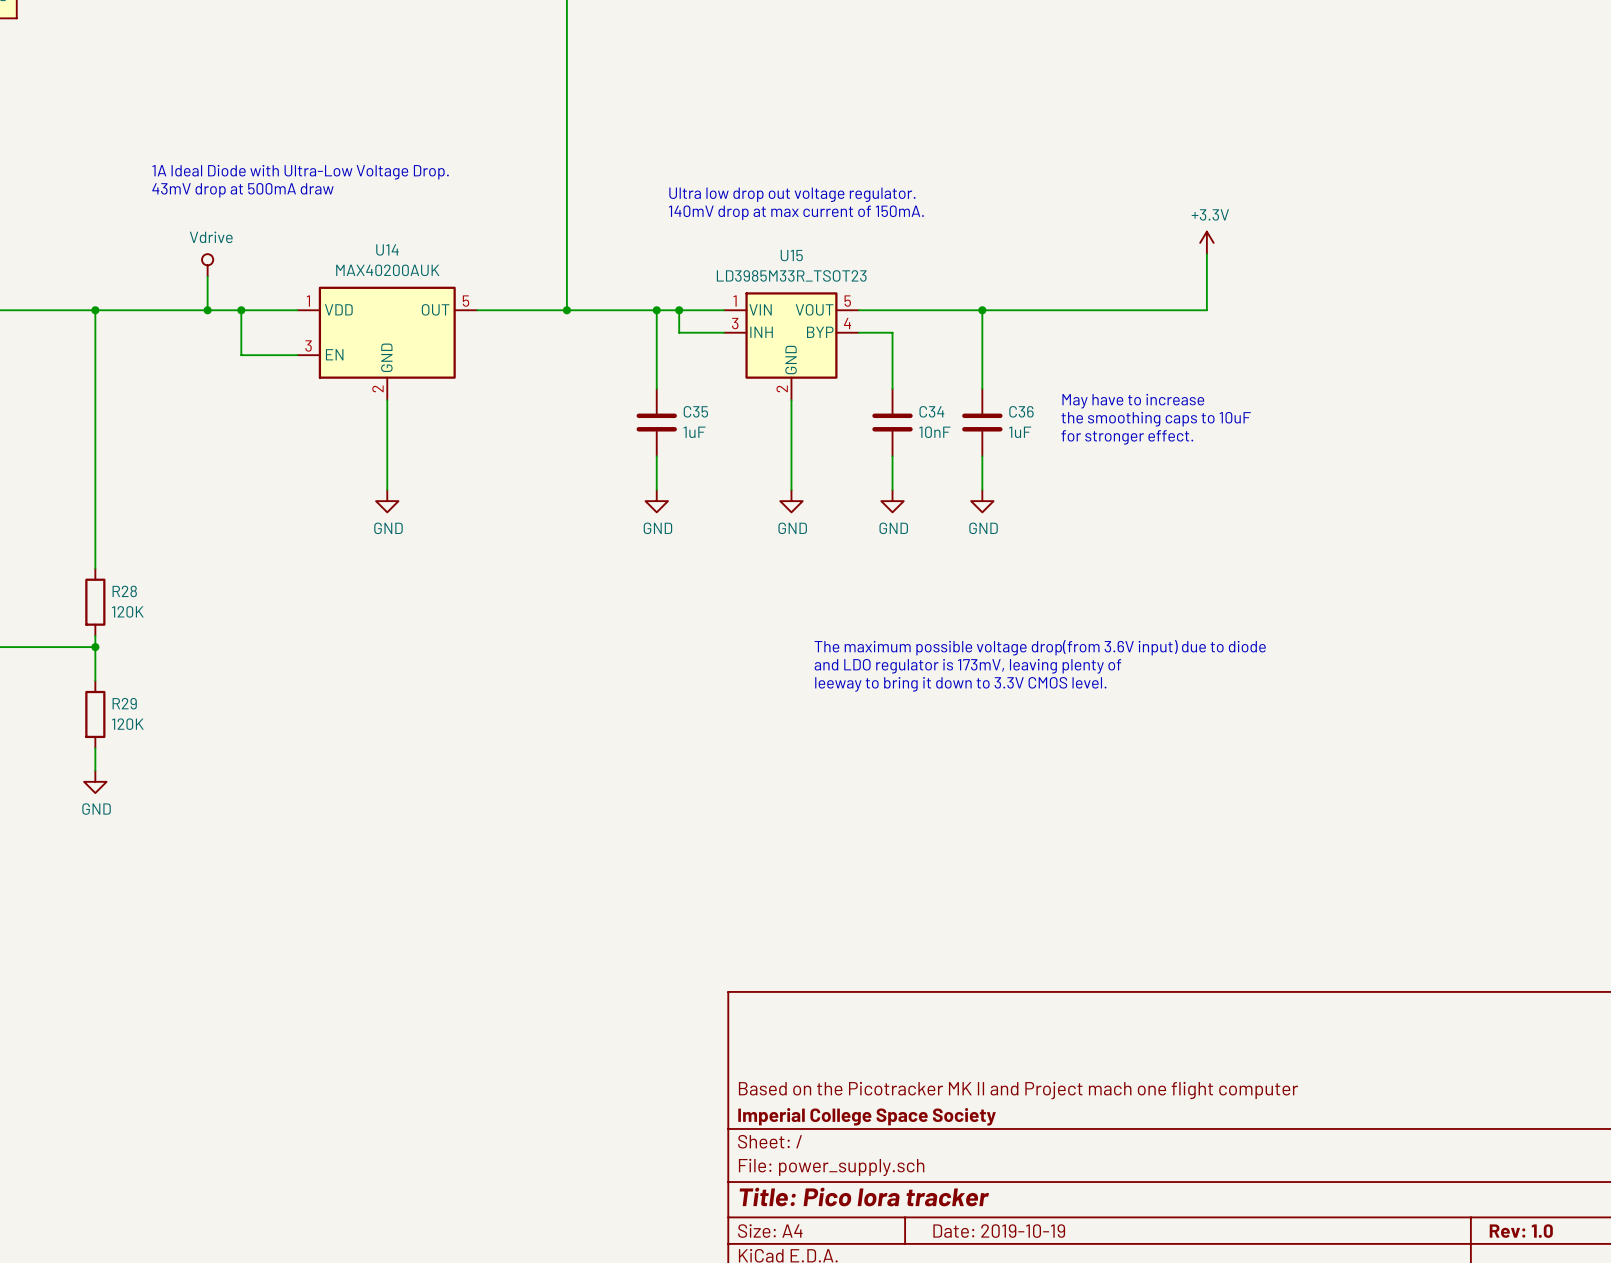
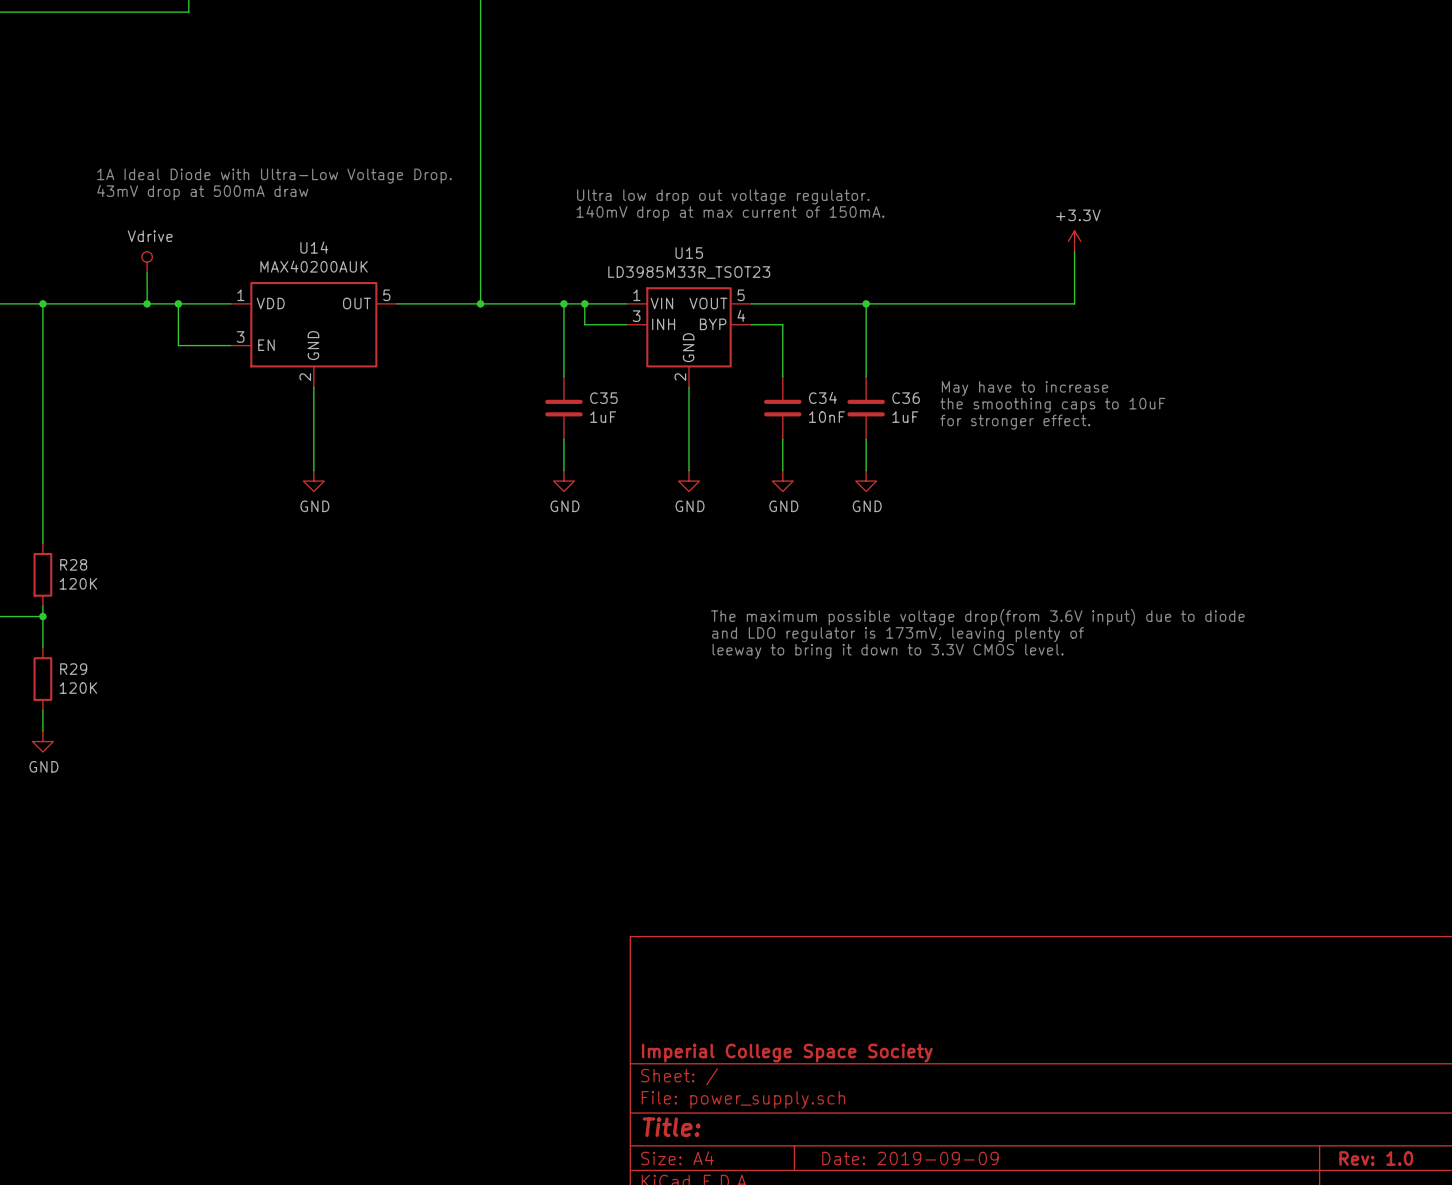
title block: Based on the Picotracker MK II and Project mach one flight computer (1018, 1090) -> none
title block: Title: Pico lora tracker (864, 1197) -> Title: (671, 1127)
title block: Date: 2019-10-19 (999, 1231) -> Date: 2019-09-09 (910, 1158)

